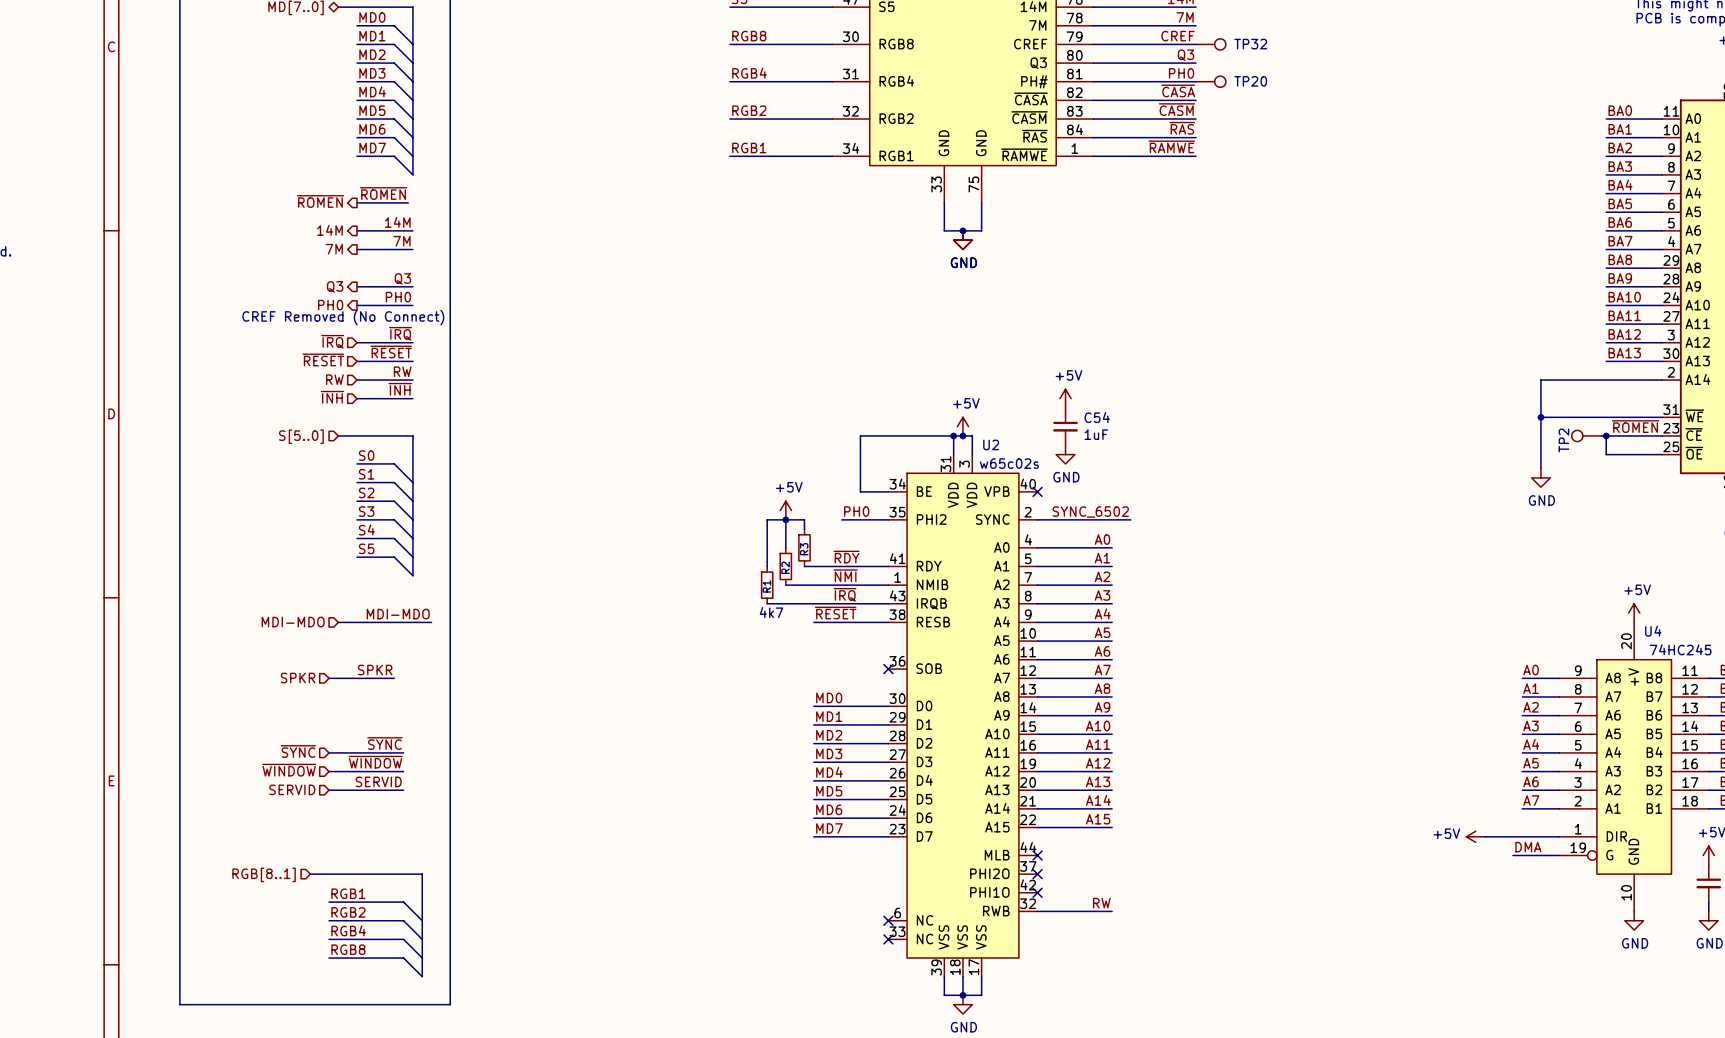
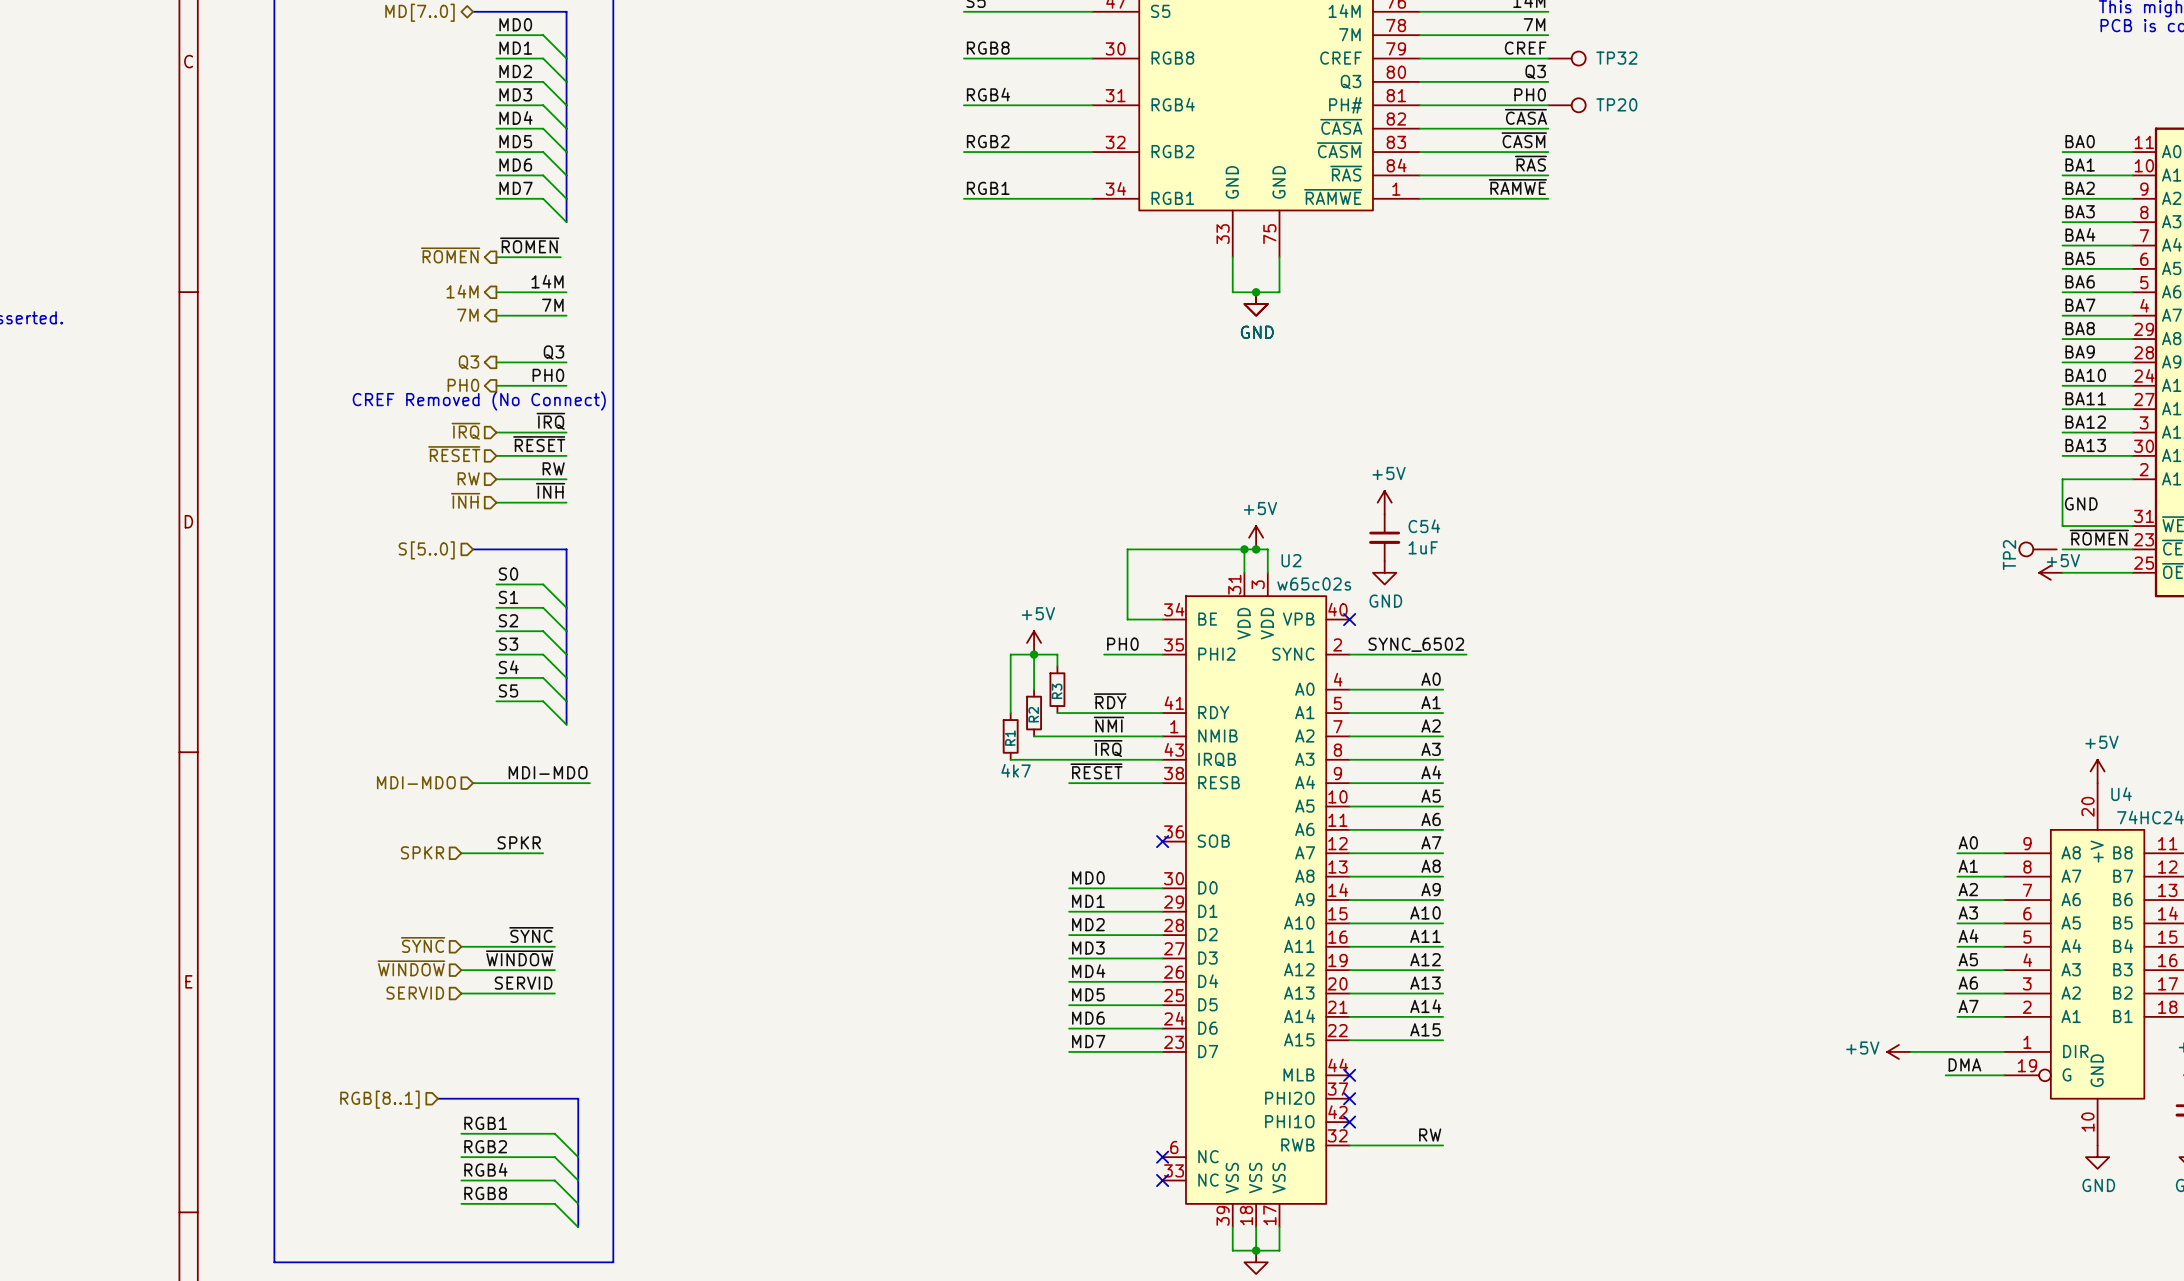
wire: (1606, 380) (1540, 380) (1540, 468) -> none
label: none -> GND (2081, 503)
wire: (1540, 417) (1606, 417) -> (2062, 479) (2062, 526)
junction: (1540, 417) -> none
wire: (1601, 435) (1606, 435) (1606, 454) -> none
junction: (1606, 435) -> none
power symbol: none -> +5V (2050, 572)
power symbol: GND (1540, 477) -> none

